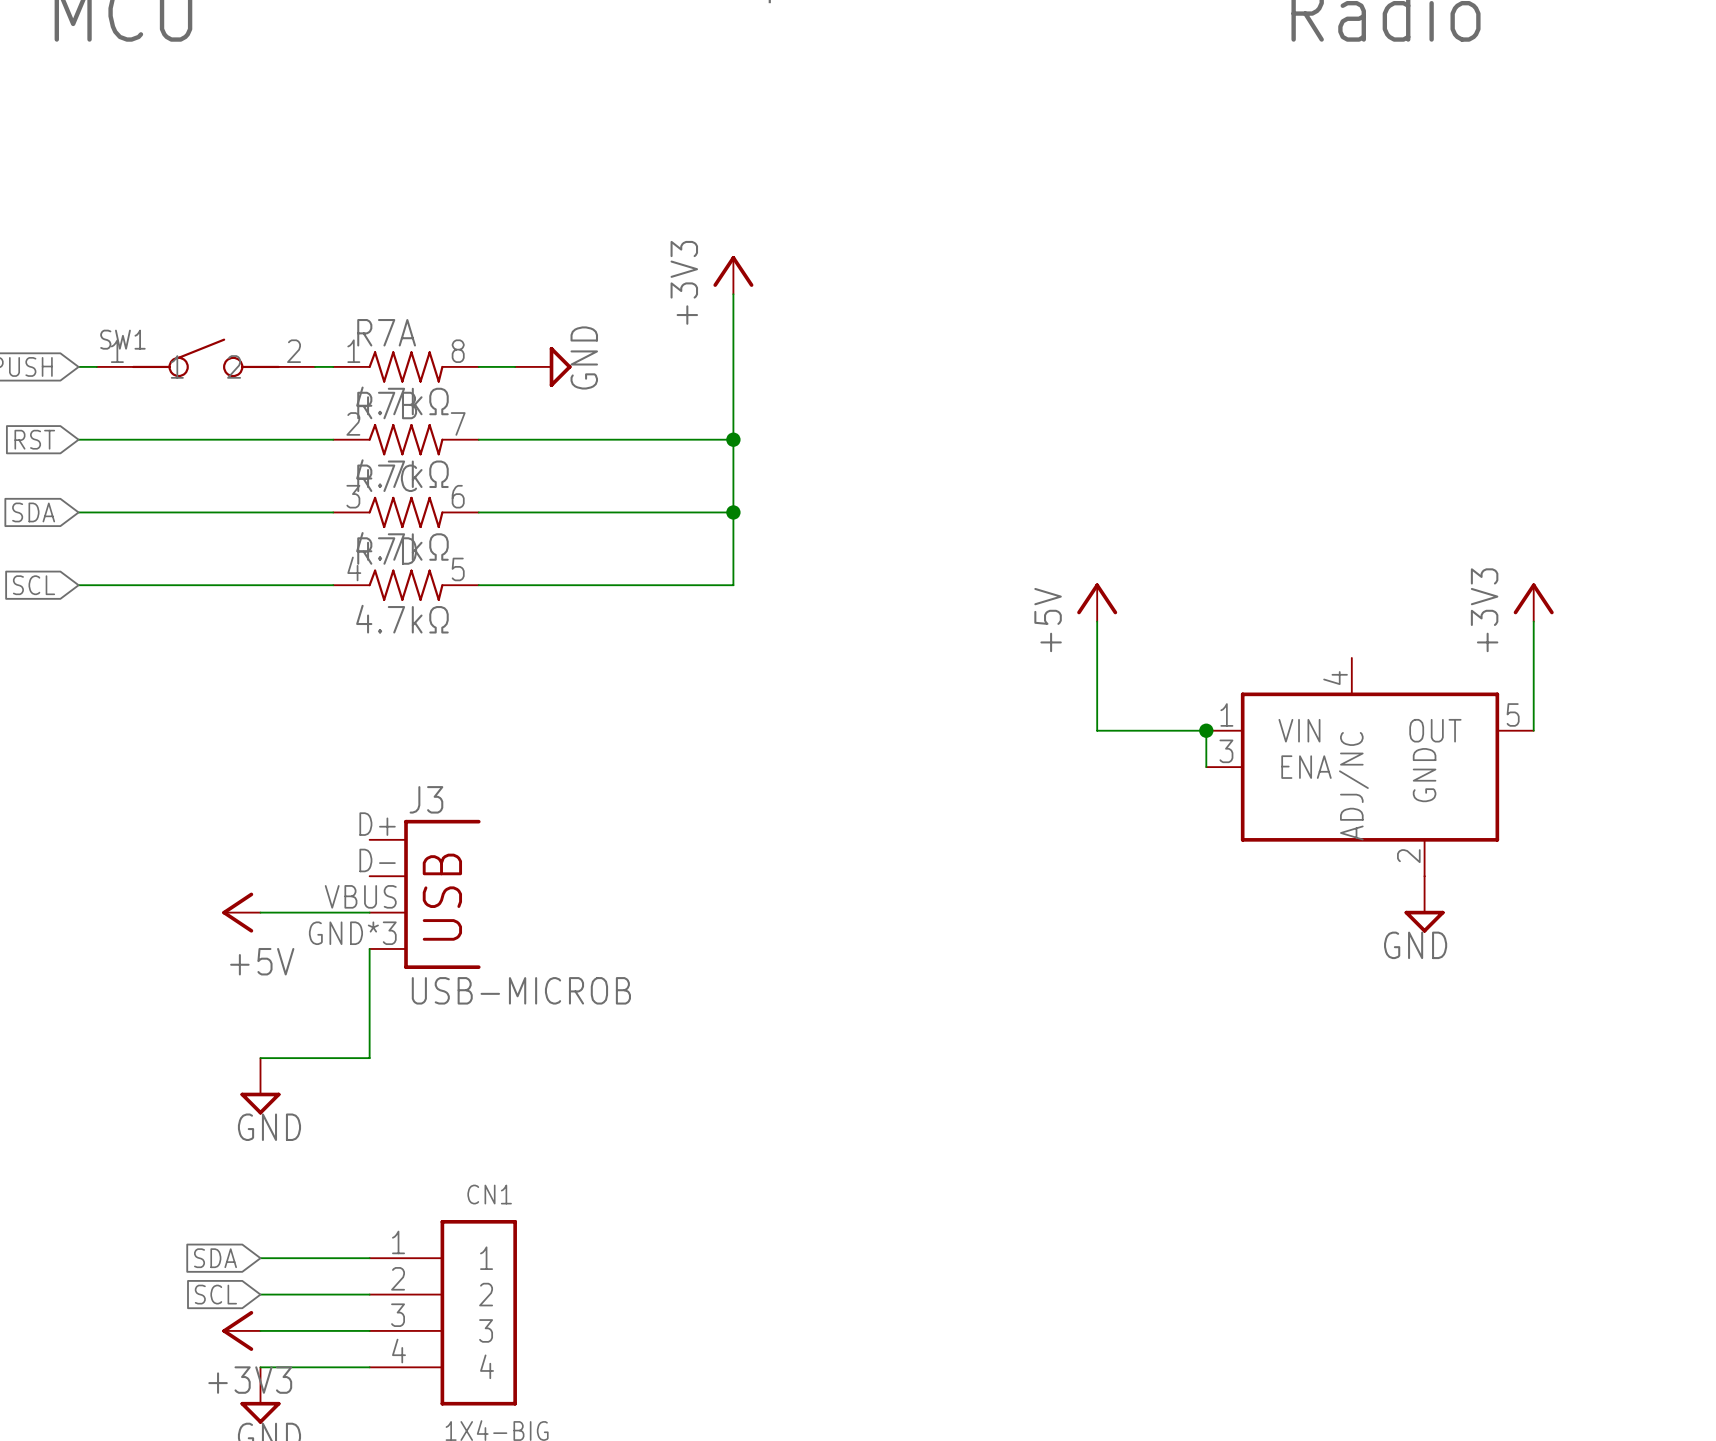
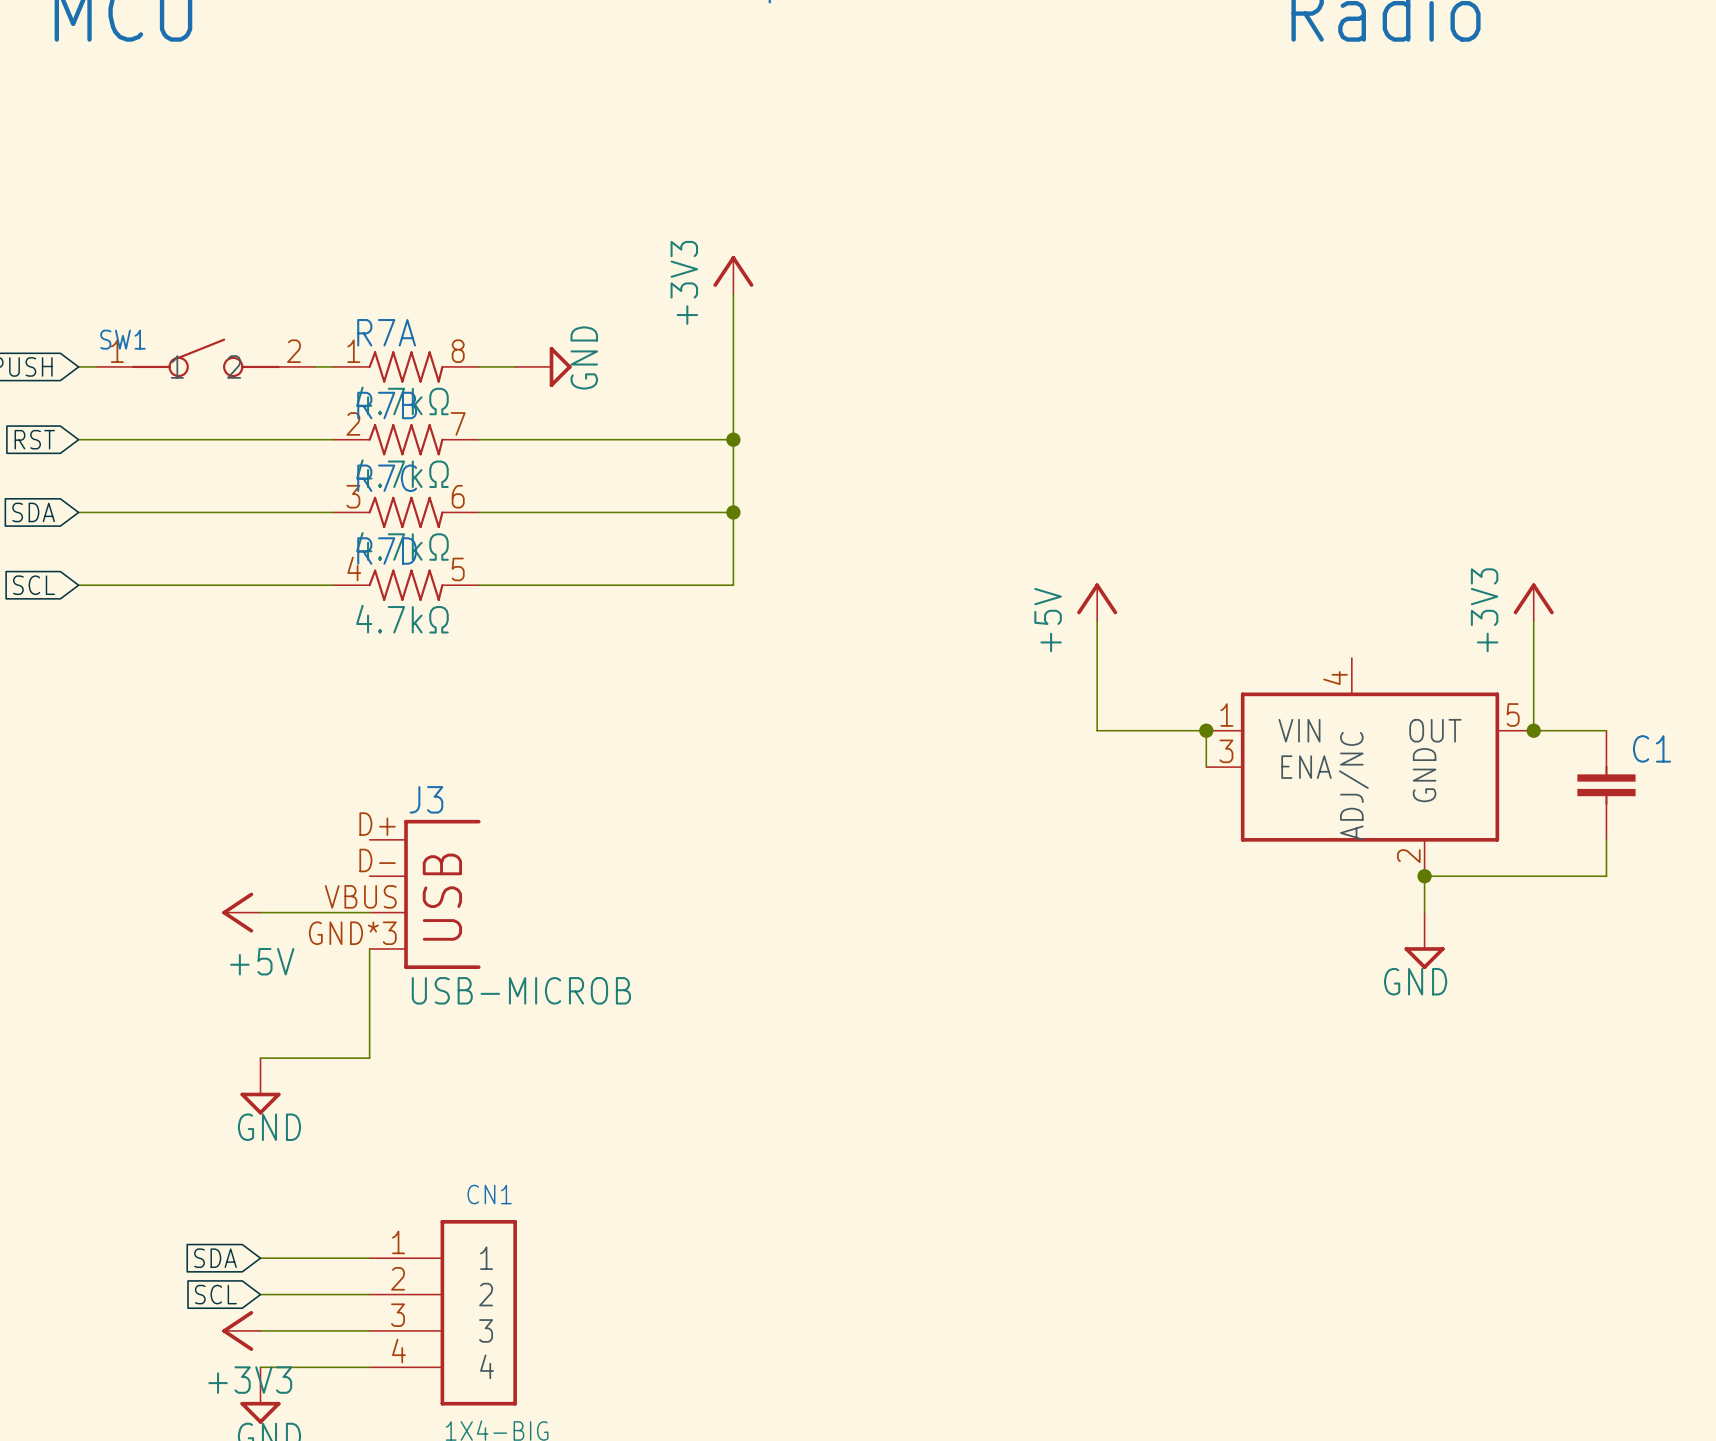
wire: none -> (1533, 730) (1606, 730)
junction: none -> (1533, 730)
C1: none -> (1606, 785)
wire: none -> (1606, 839) (1606, 876) (1424, 876) (1424, 912)
junction: none -> (1424, 876)
power symbol position: GND (1424, 904) -> GND (1424, 940)

